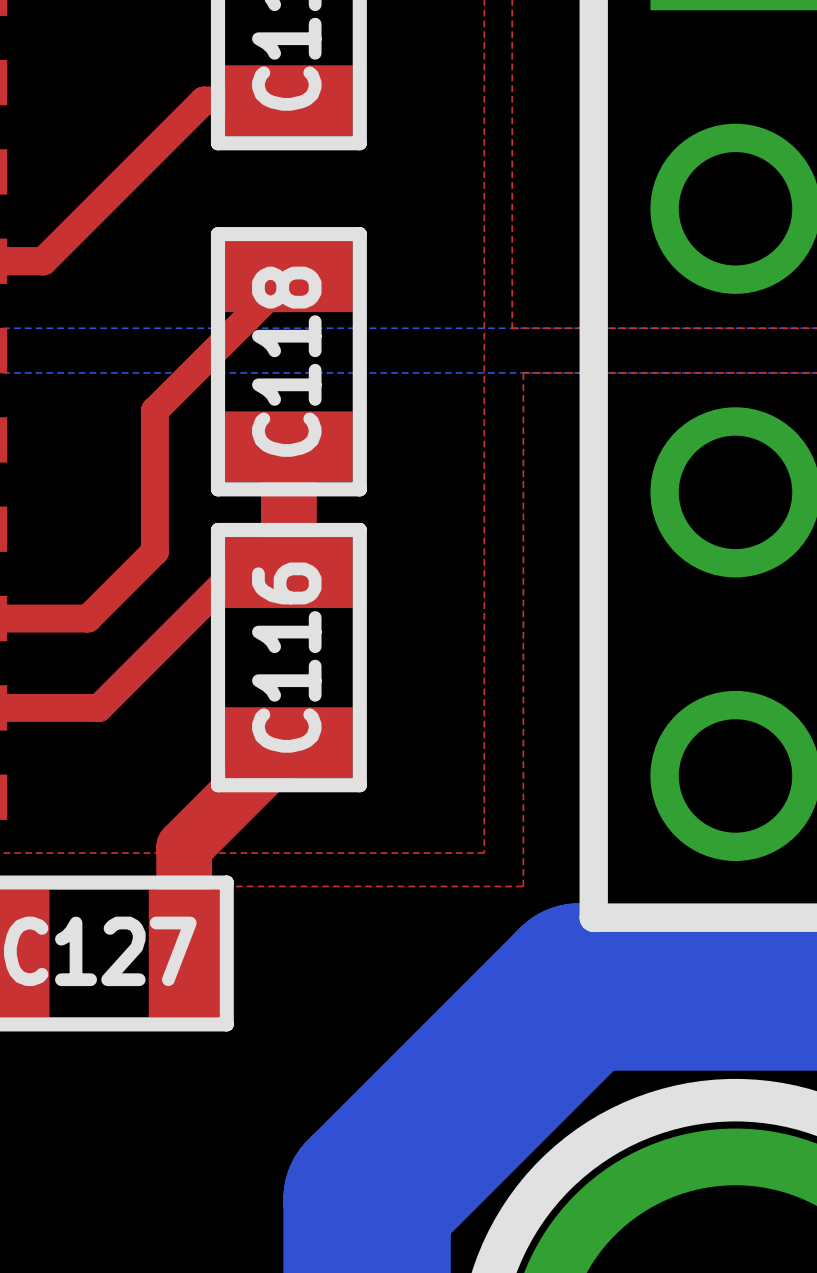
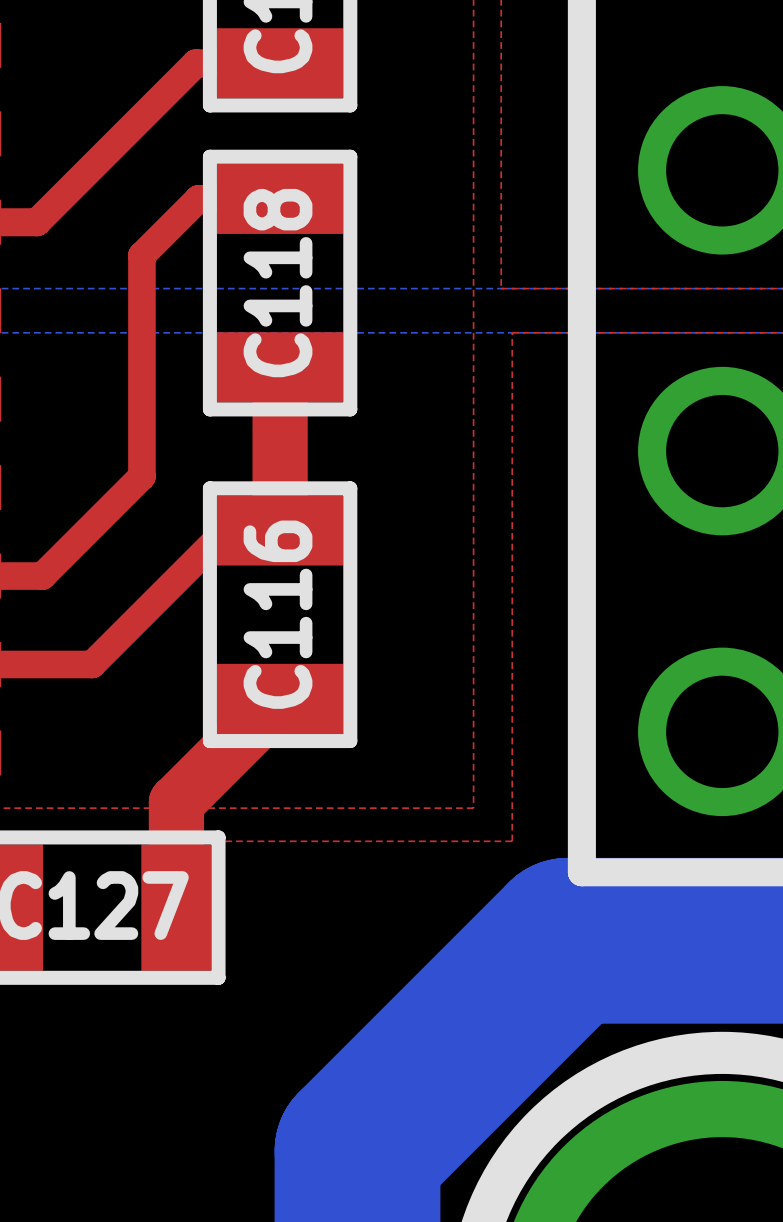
top track: (288, 276) (154, 410) (154, 551) (87, 618) (48, 618) -> (280, 198) (198, 198) (141, 255) (141, 476) (42, 576)
C118 position: (288, 361) -> (280, 283)

